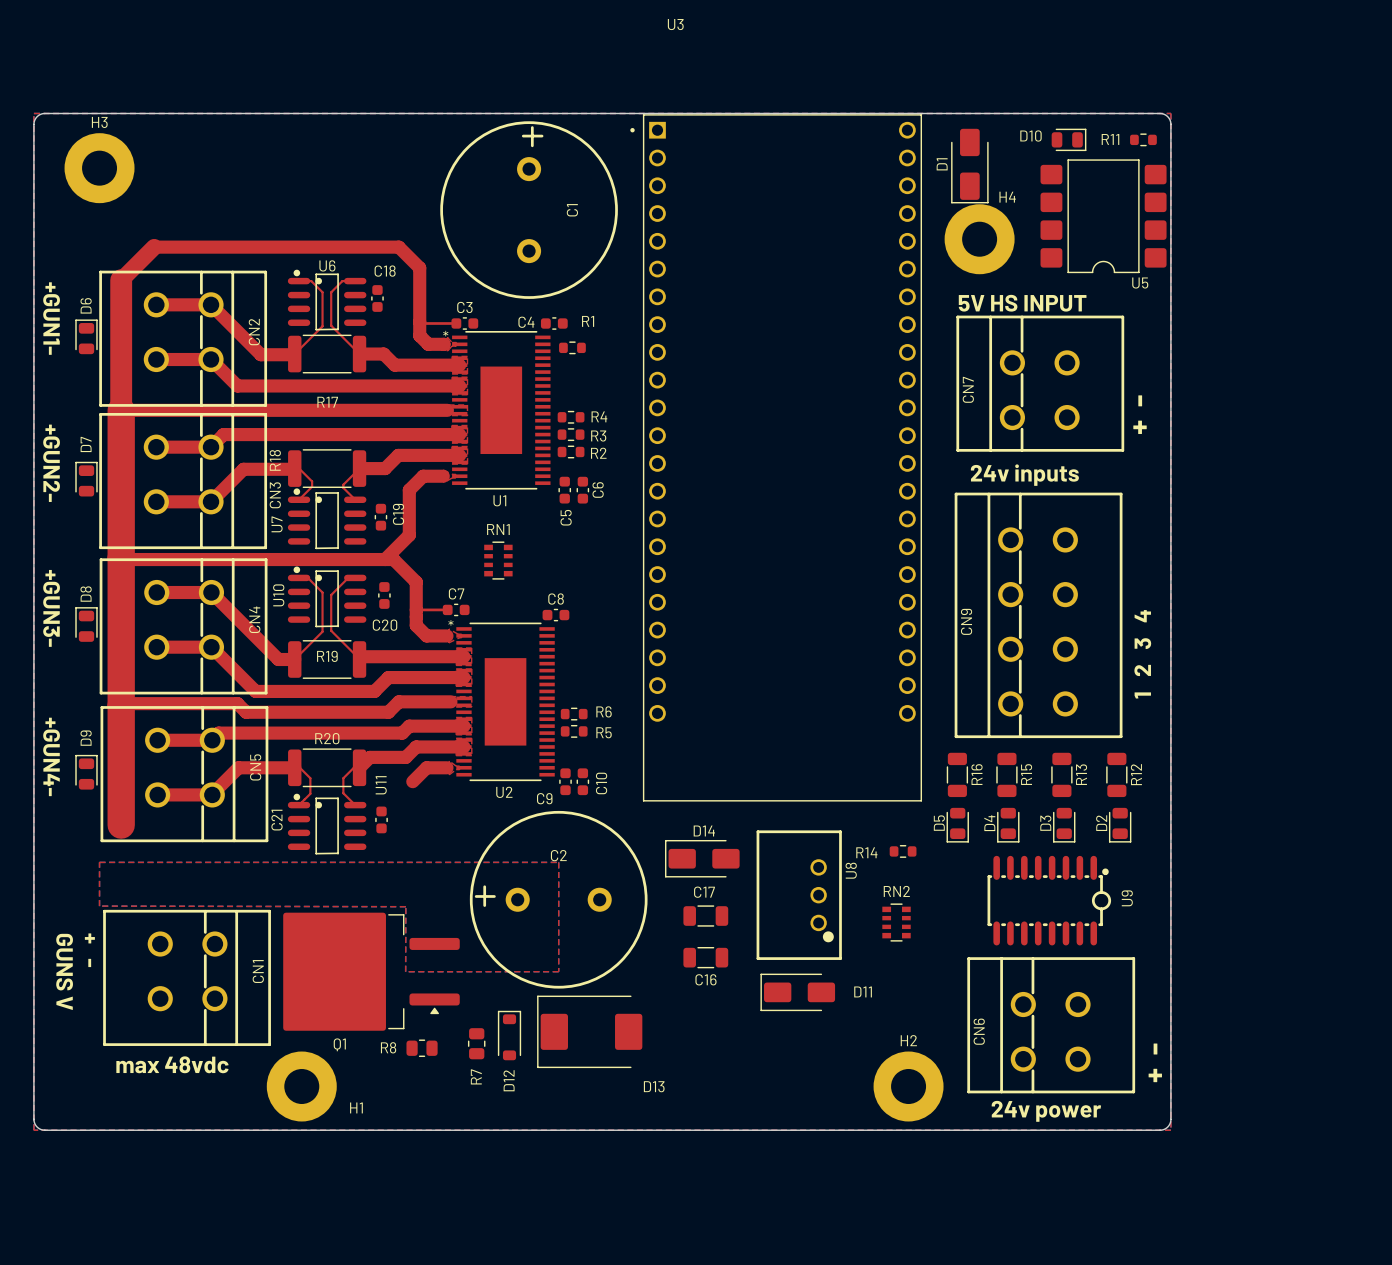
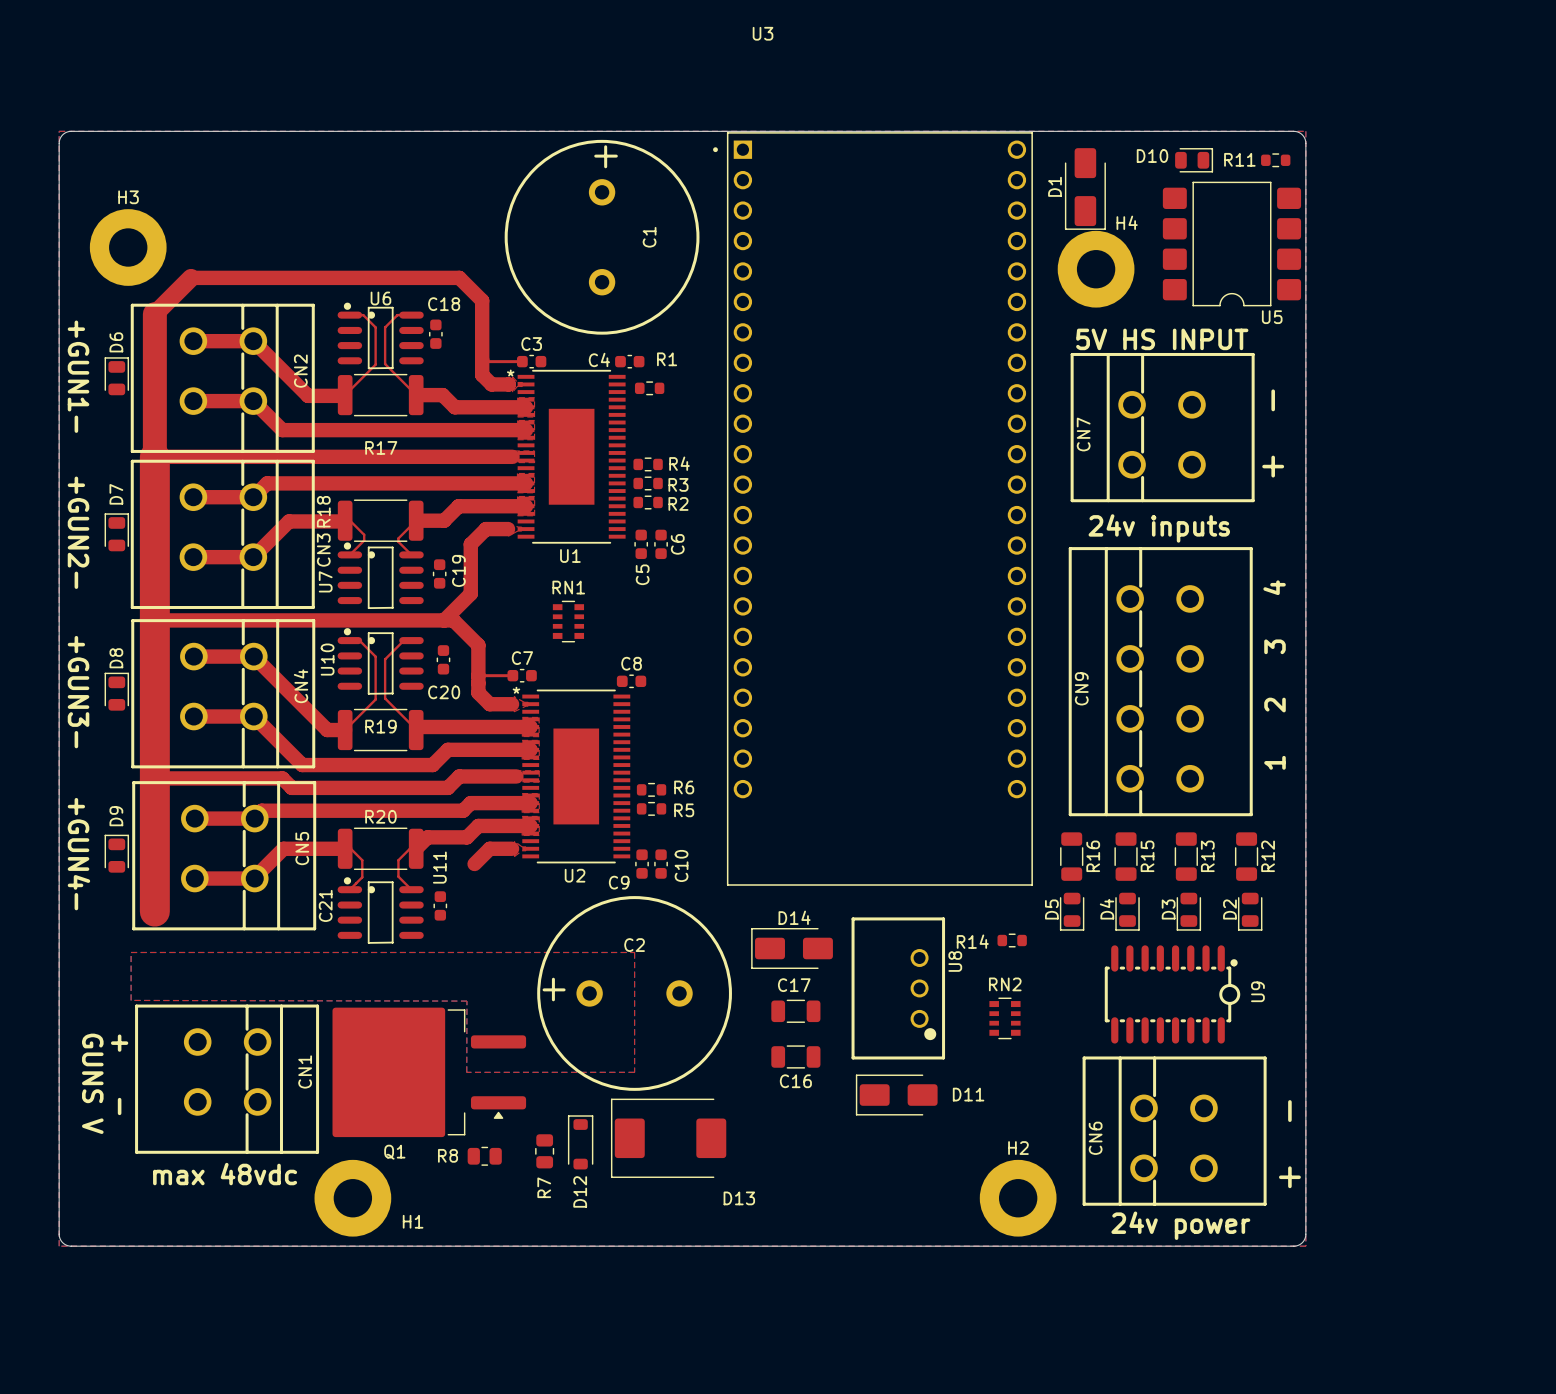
H3 position: (99, 168) -> (128, 247)

